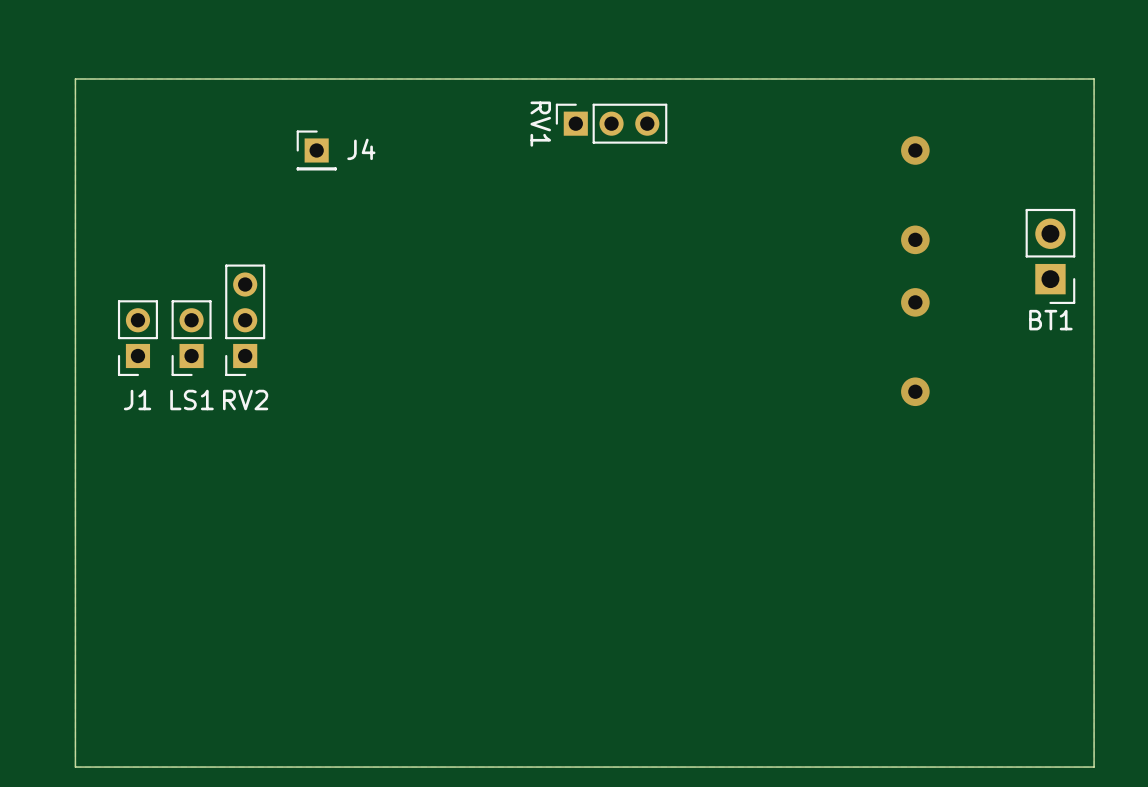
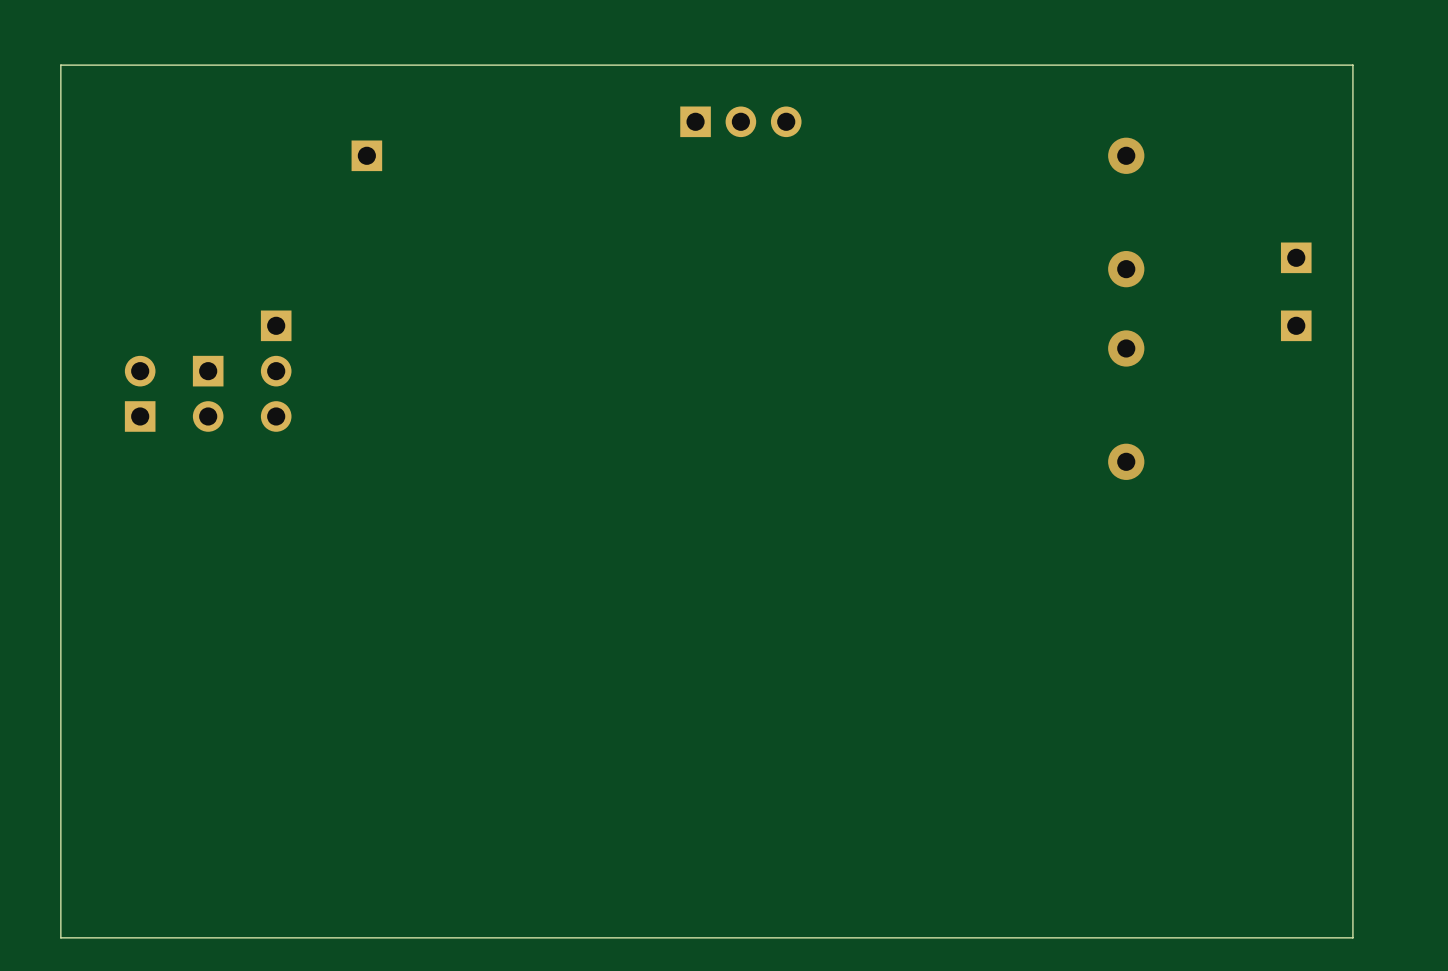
RV1 side: bottom (611, 123) -> top (740, 121)
J4 side: bottom (316, 150) -> top (366, 155)
part: none -> (1296, 257)
BT1: (1050, 256) -> none
part: none -> (1296, 325)
RV2 side: bottom (245, 320) -> top (276, 371)
J1 side: bottom (137, 338) -> top (140, 393)
LS1 side: bottom (191, 338) -> top (208, 393)

